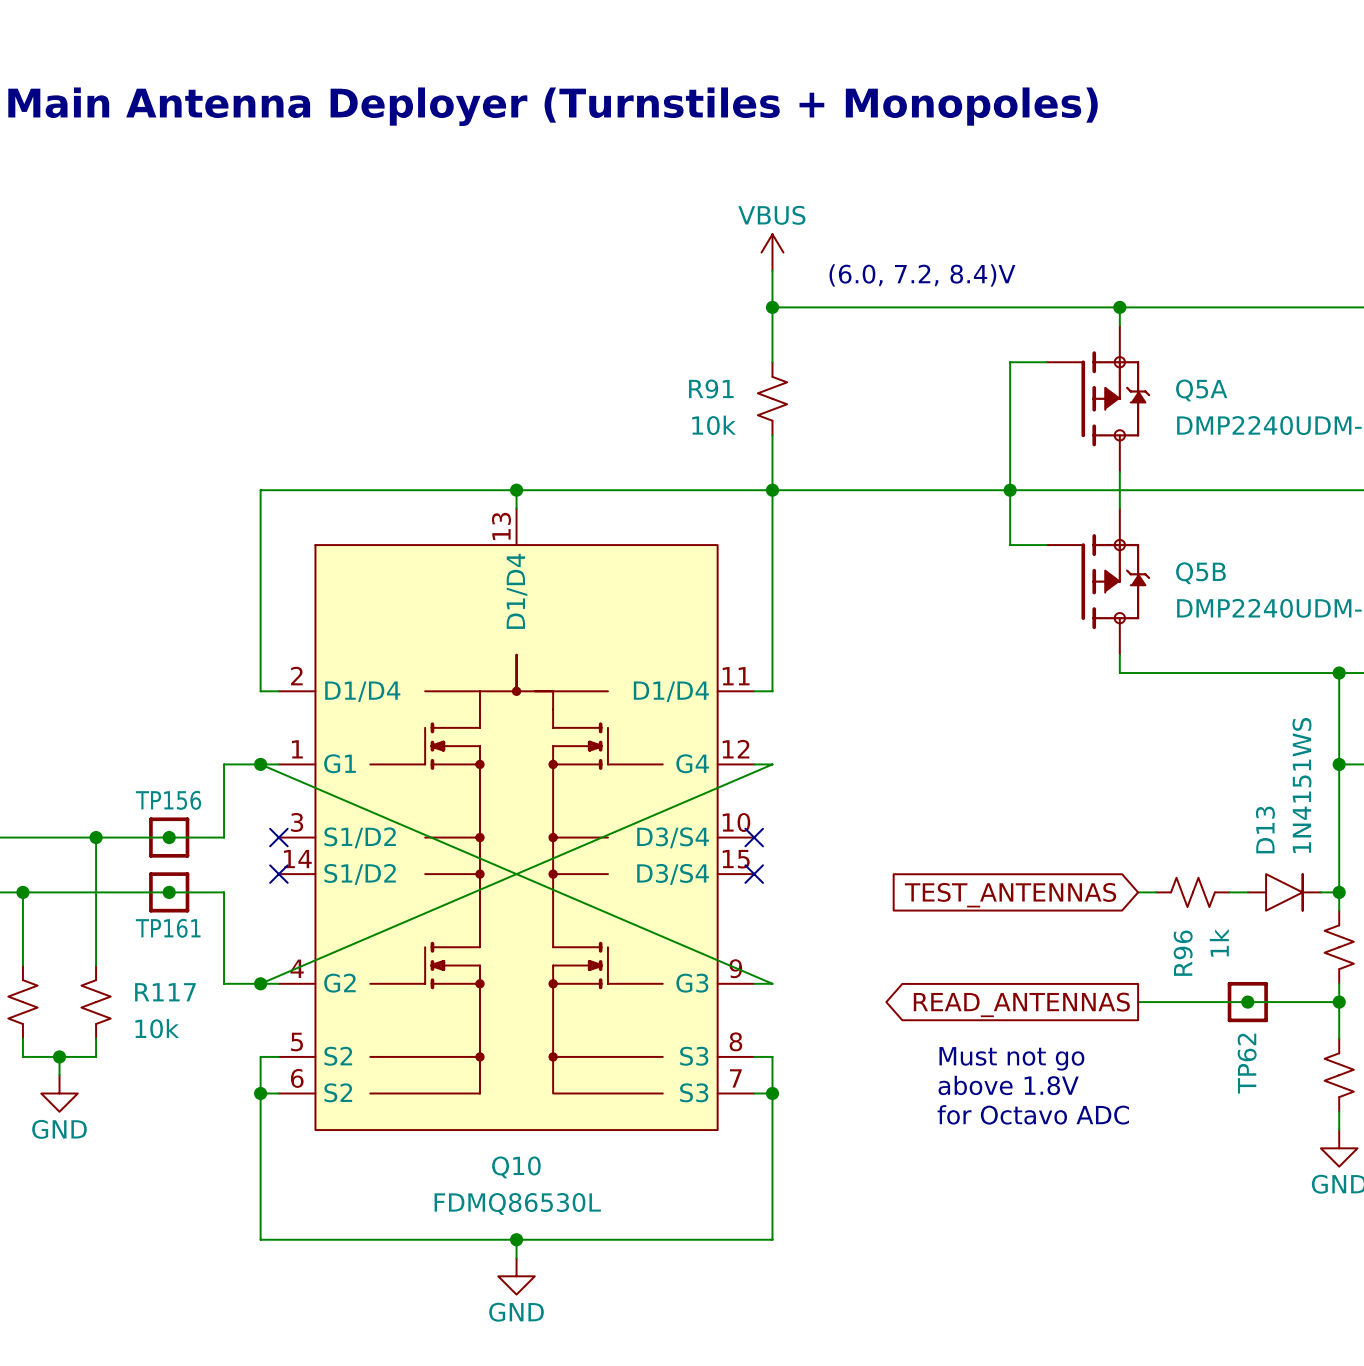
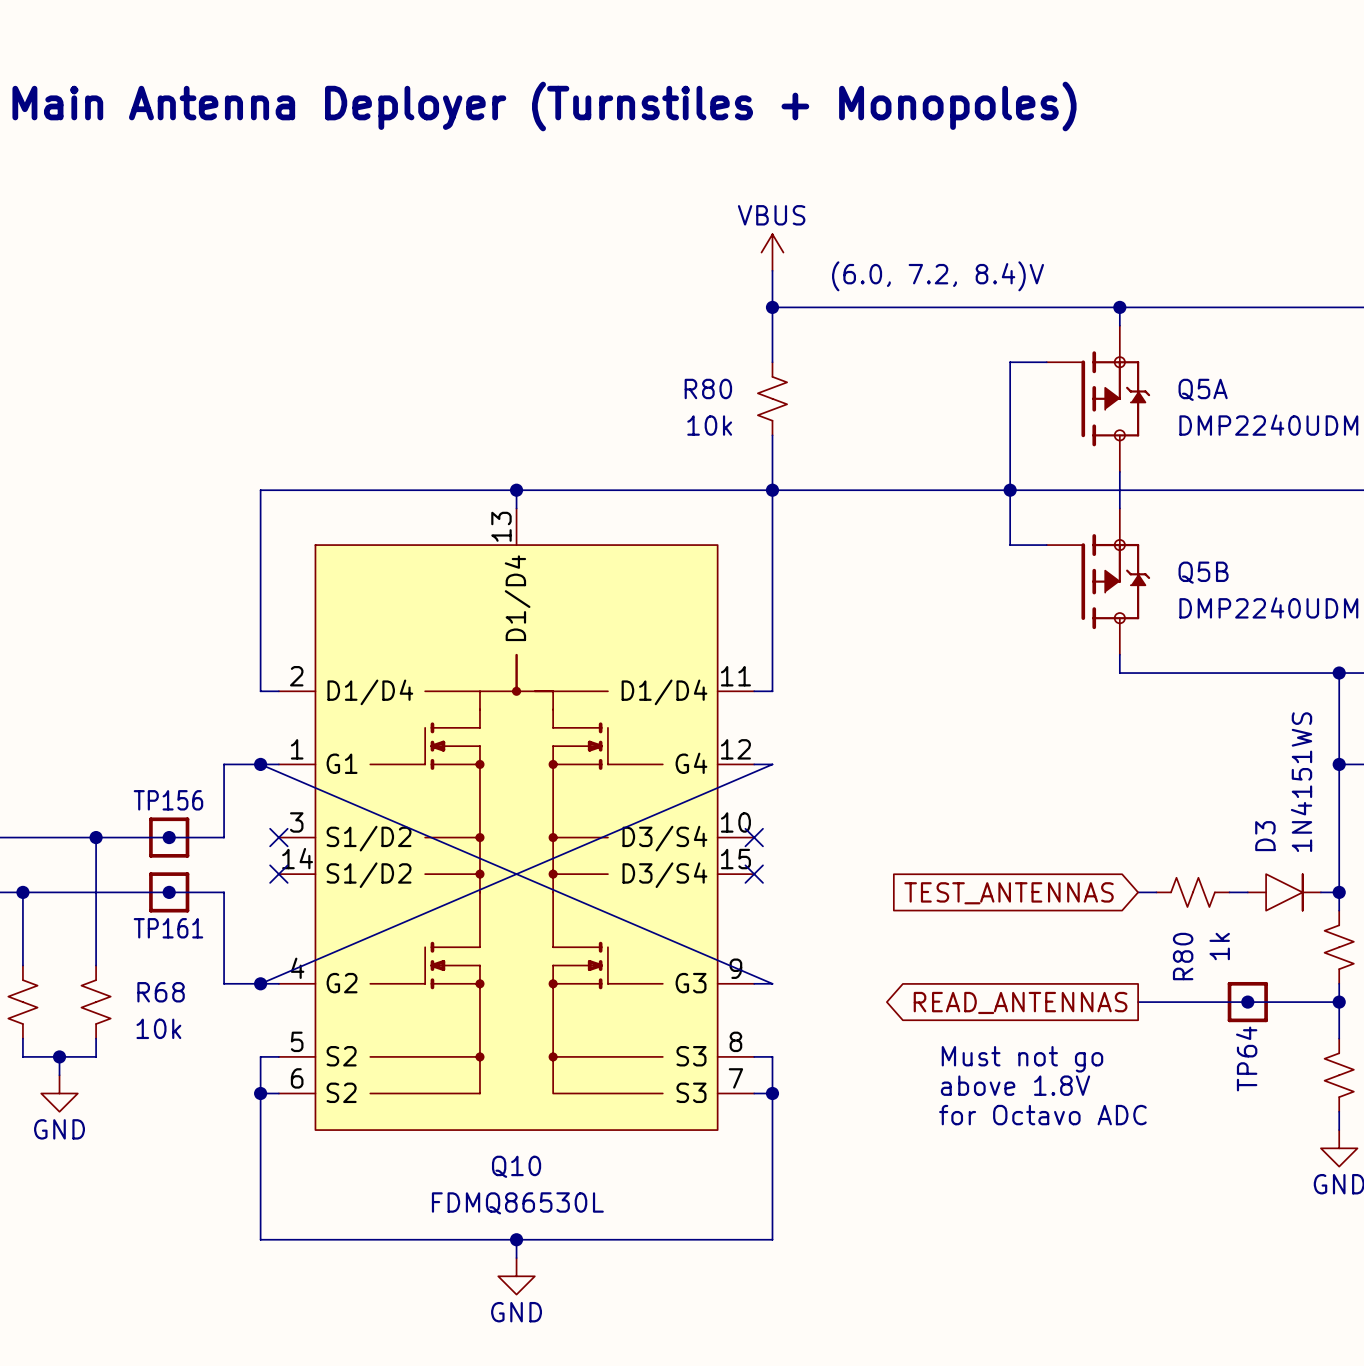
R91 name: R91 (711, 388) -> R80 (708, 388)
D13 name: D13 (1265, 830) -> D3 (1265, 836)
R96 name: R96 (1183, 953) -> R80 (1183, 956)
R117 name: R117 (165, 992) -> R68 (161, 992)
TP62 name: TP62 (1247, 1063) -> TP64 (1246, 1058)

